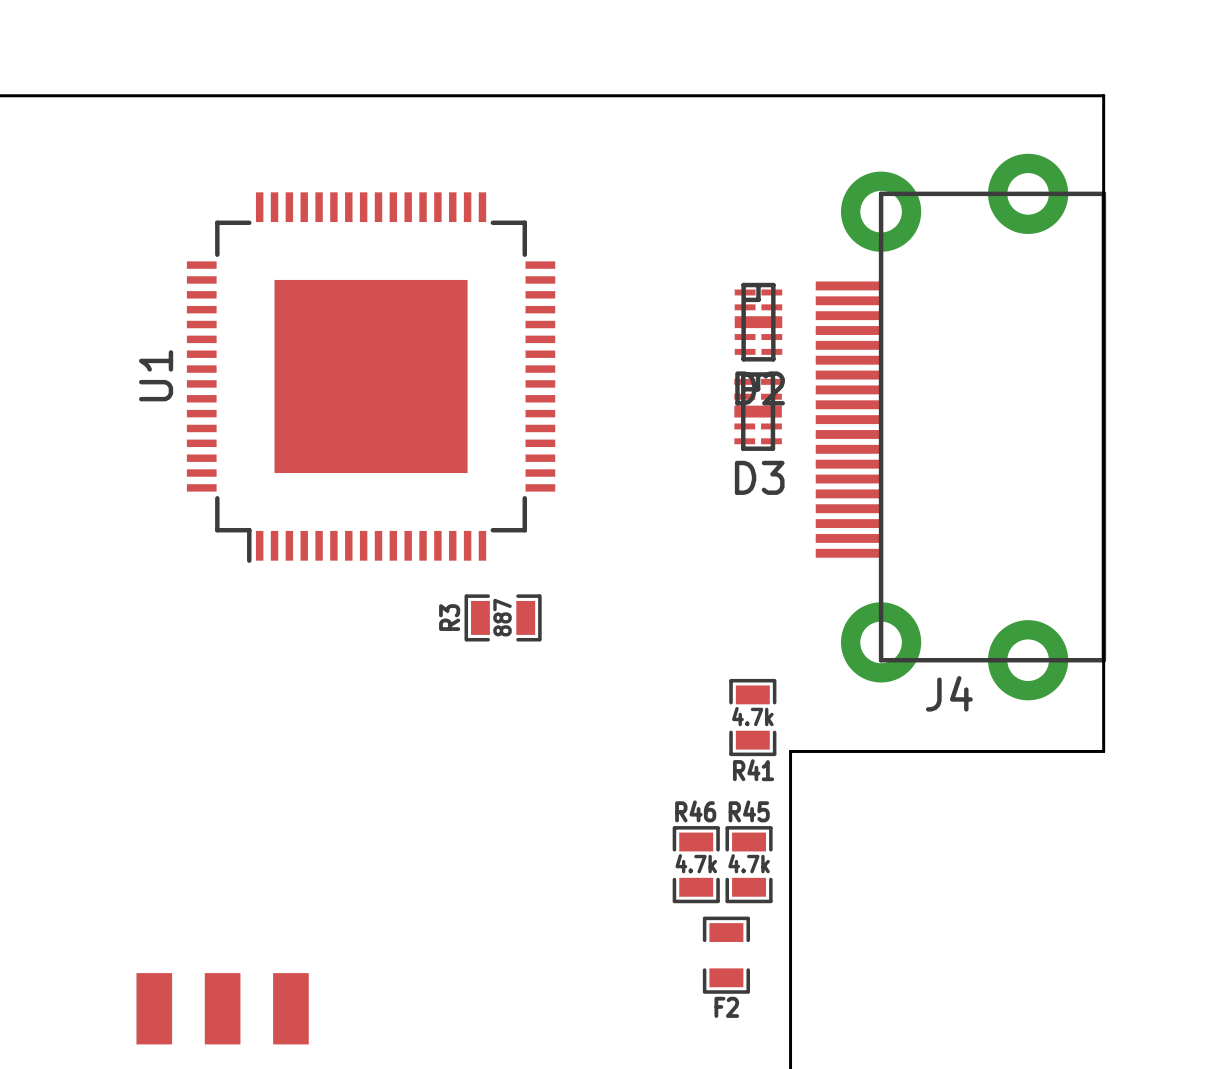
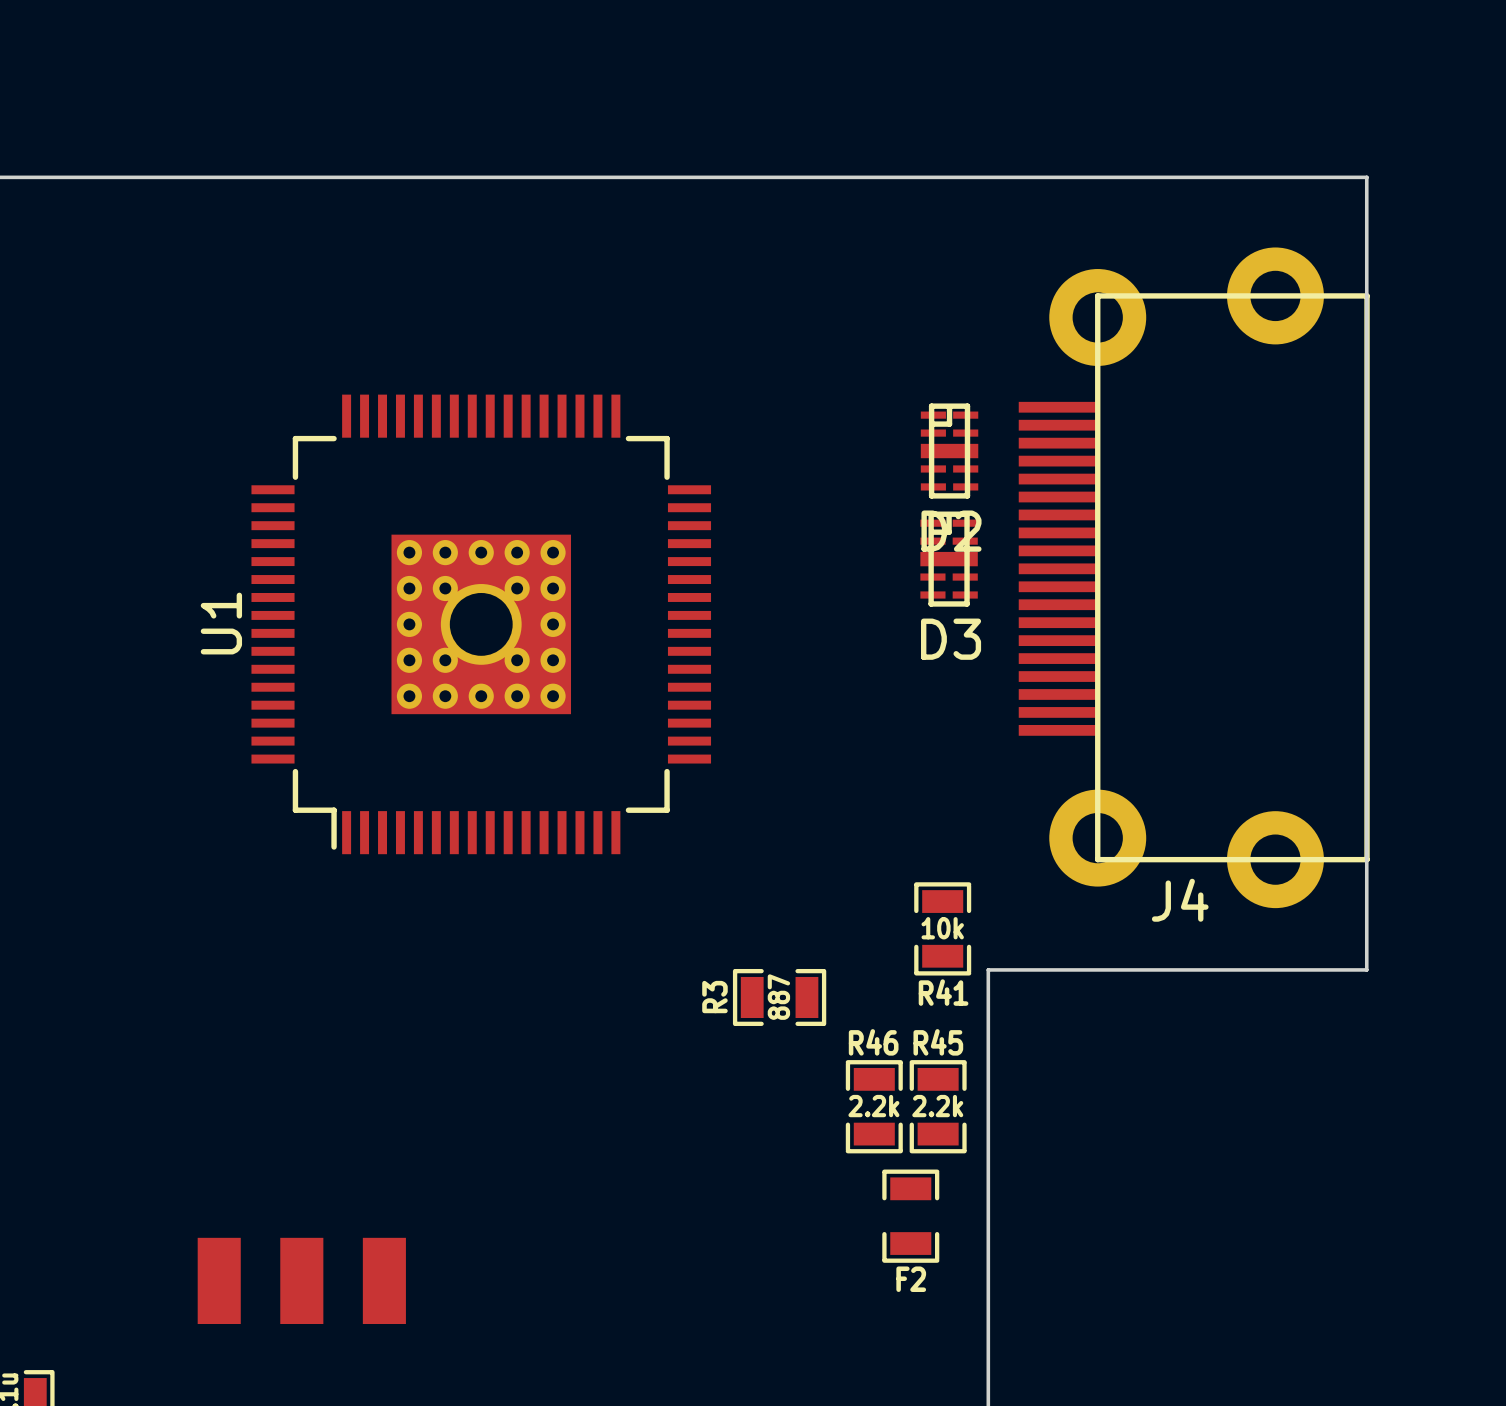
U1 footprint: [186, 192, 556, 563] -> [251, 394, 712, 855]
R3 position: (503, 617) -> (779, 997)
R41 value: 4.7k (752, 716) -> 10k (942, 928)
R46 value: 4.7k (696, 863) -> 2.2k (873, 1106)
R45 value: 4.7k (749, 863) -> 2.2k (937, 1106)

